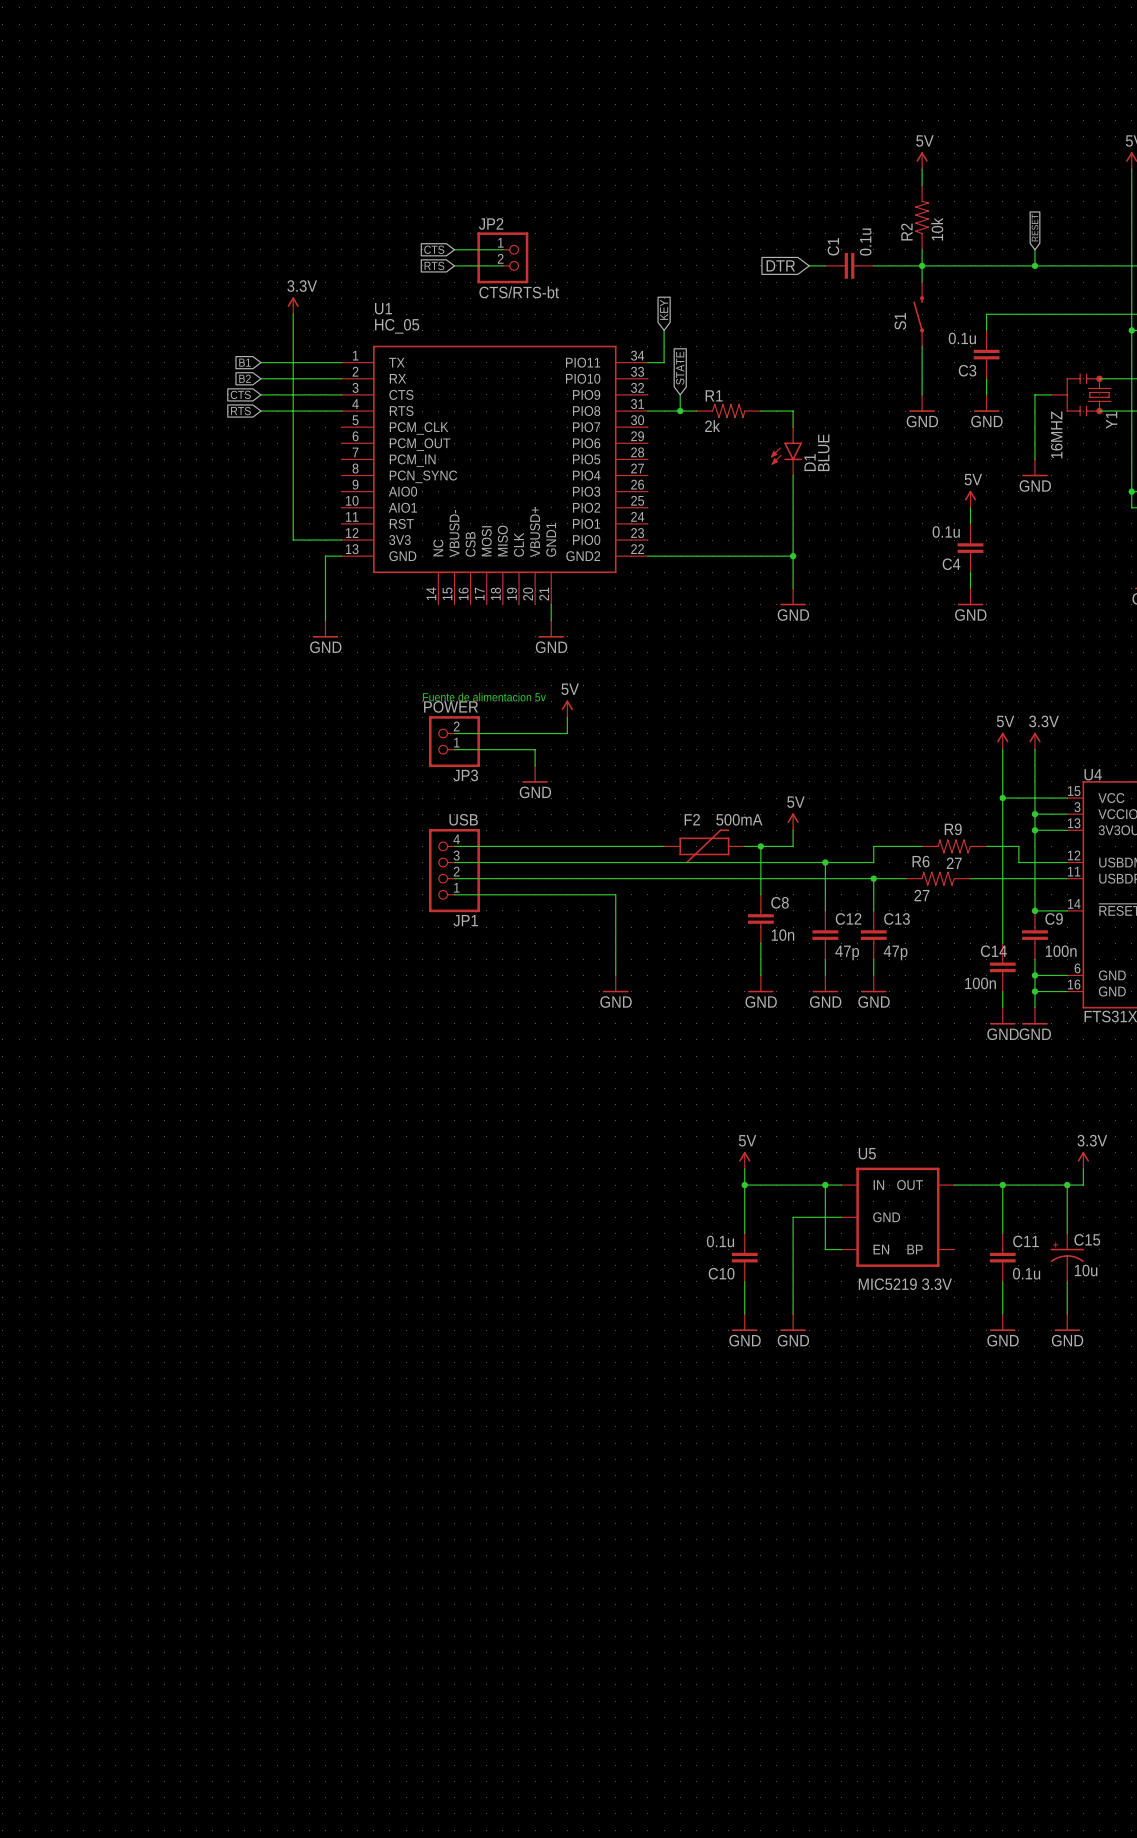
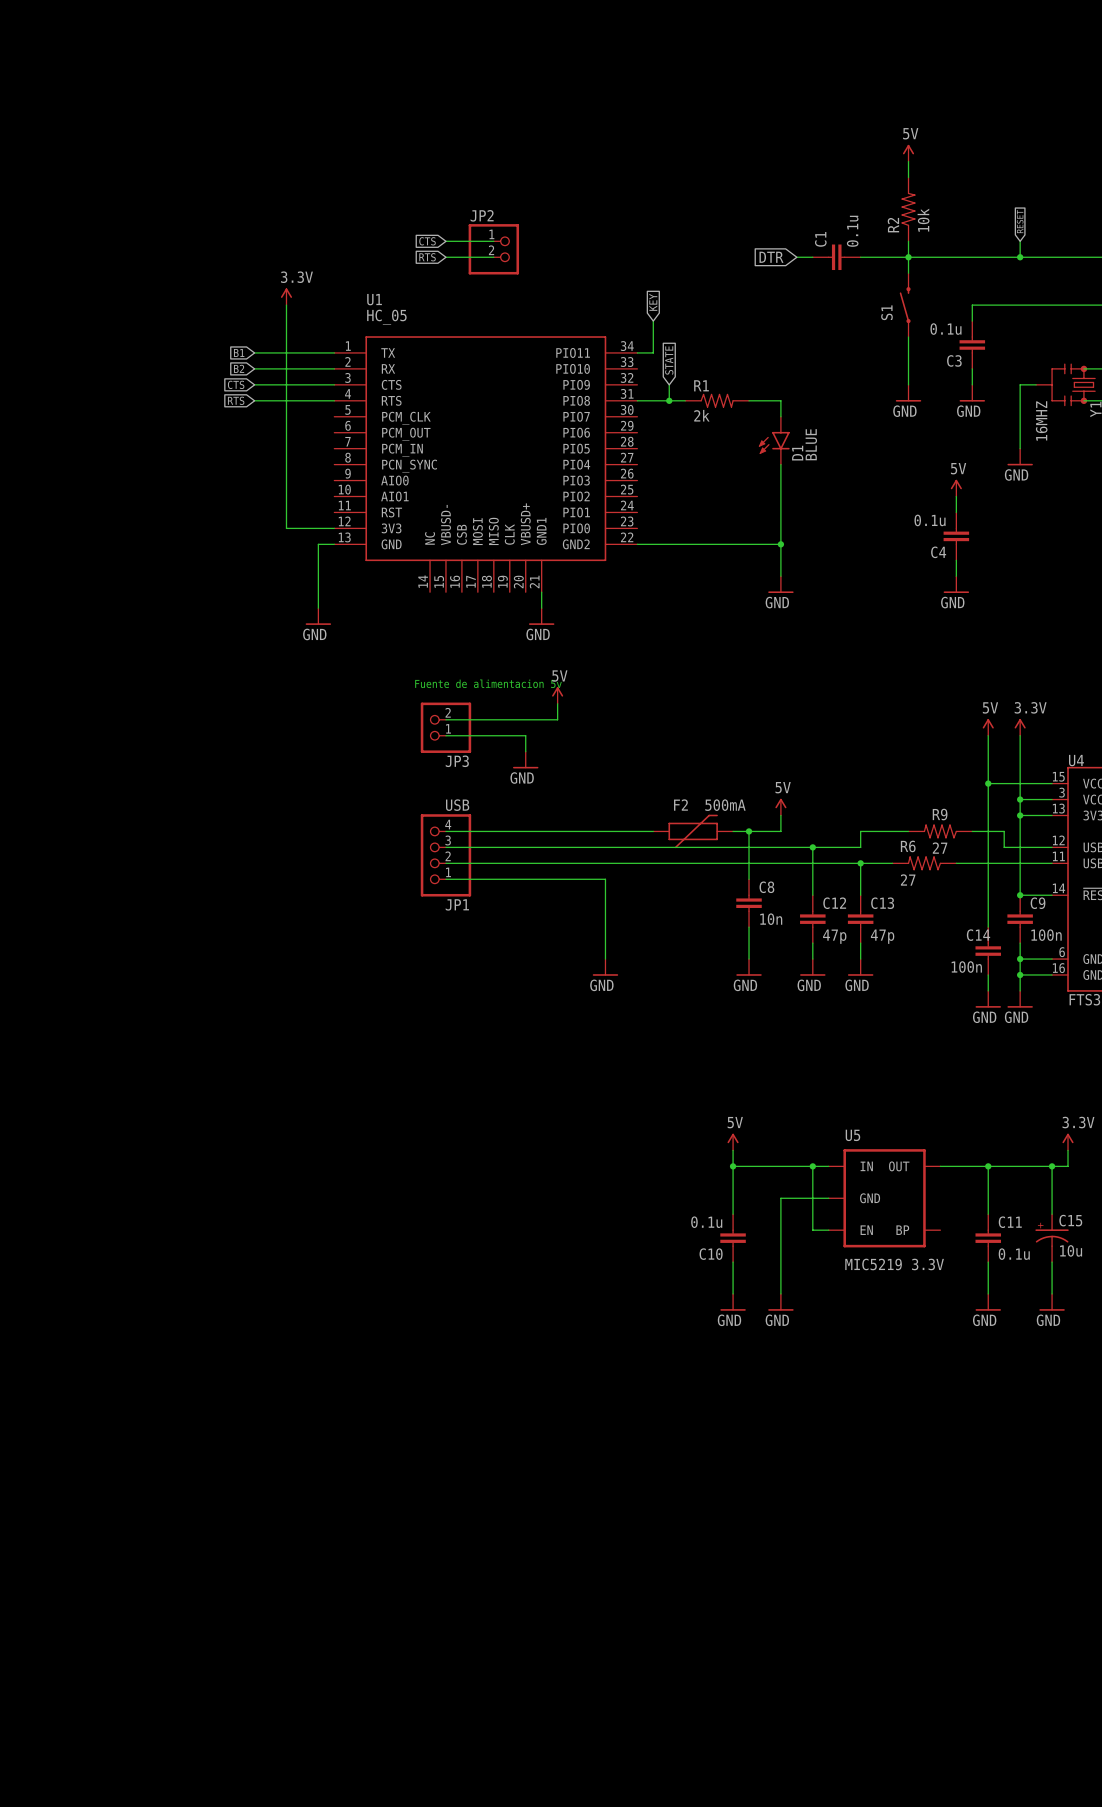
JP2 value: CTS/RTS-bt (519, 292) -> none
JP3 value: POWER (451, 706) -> none

